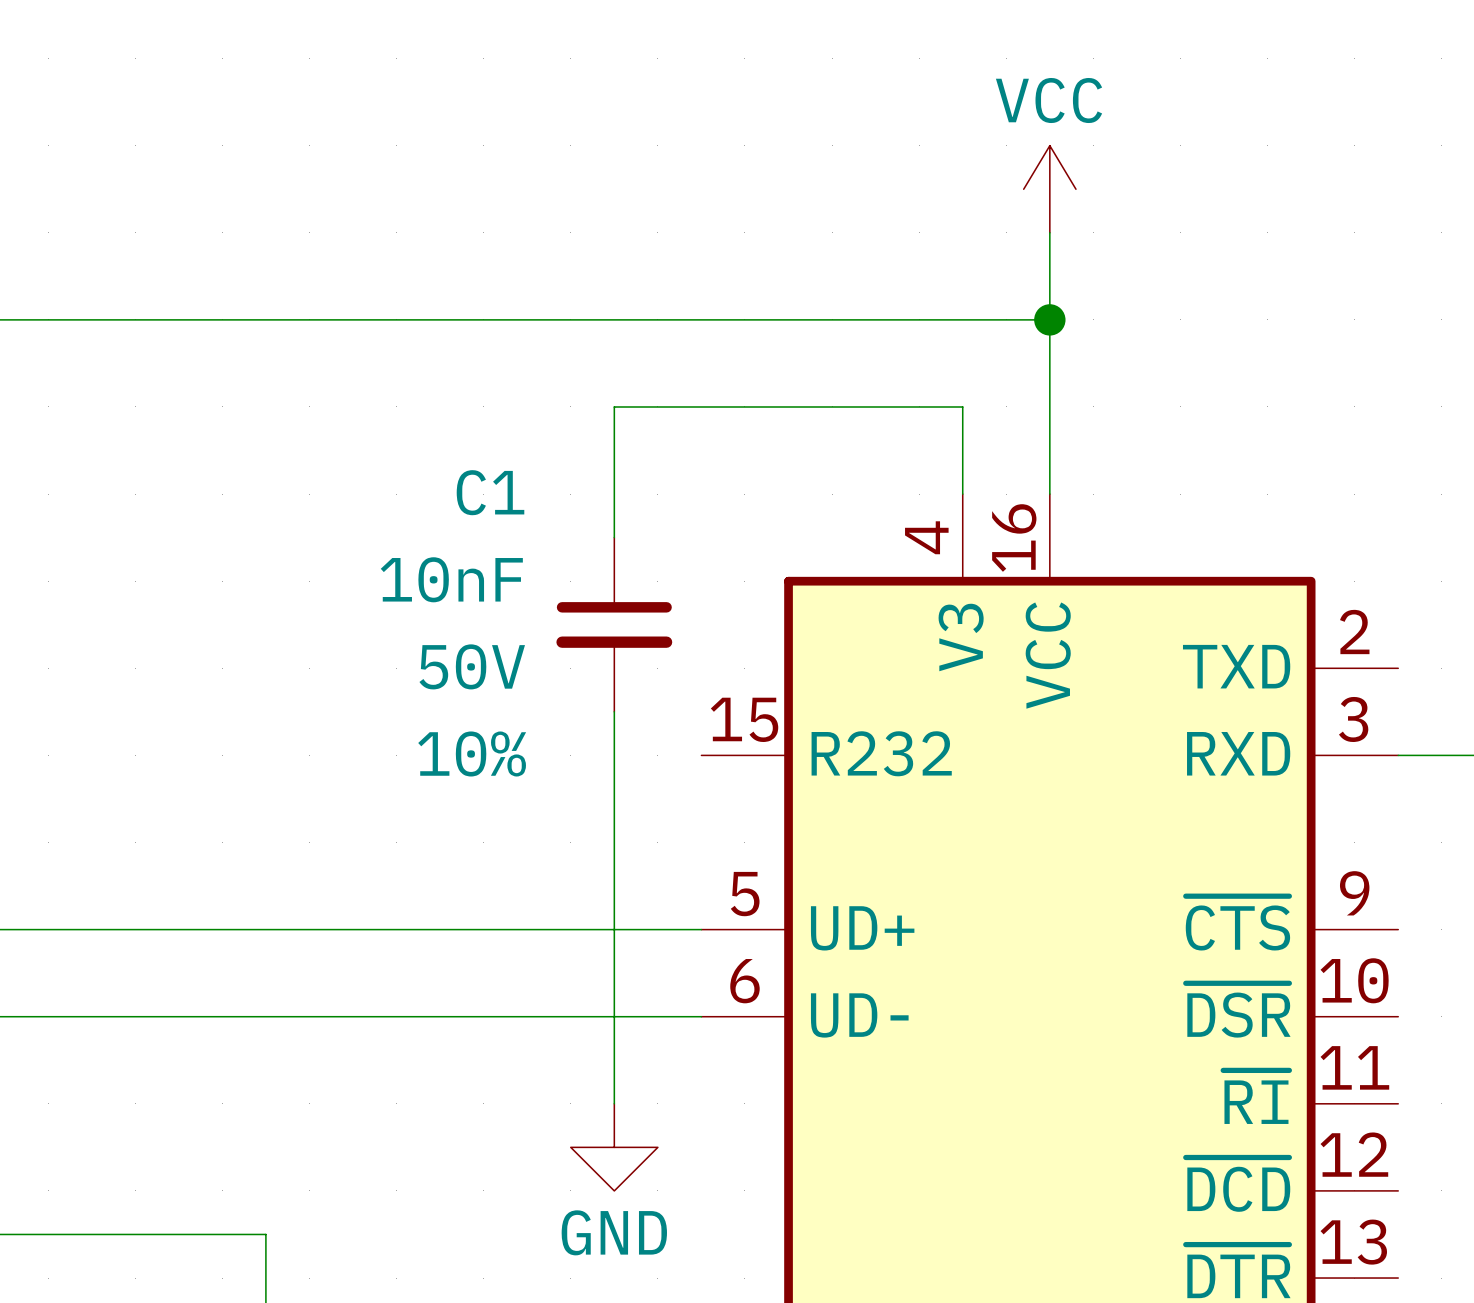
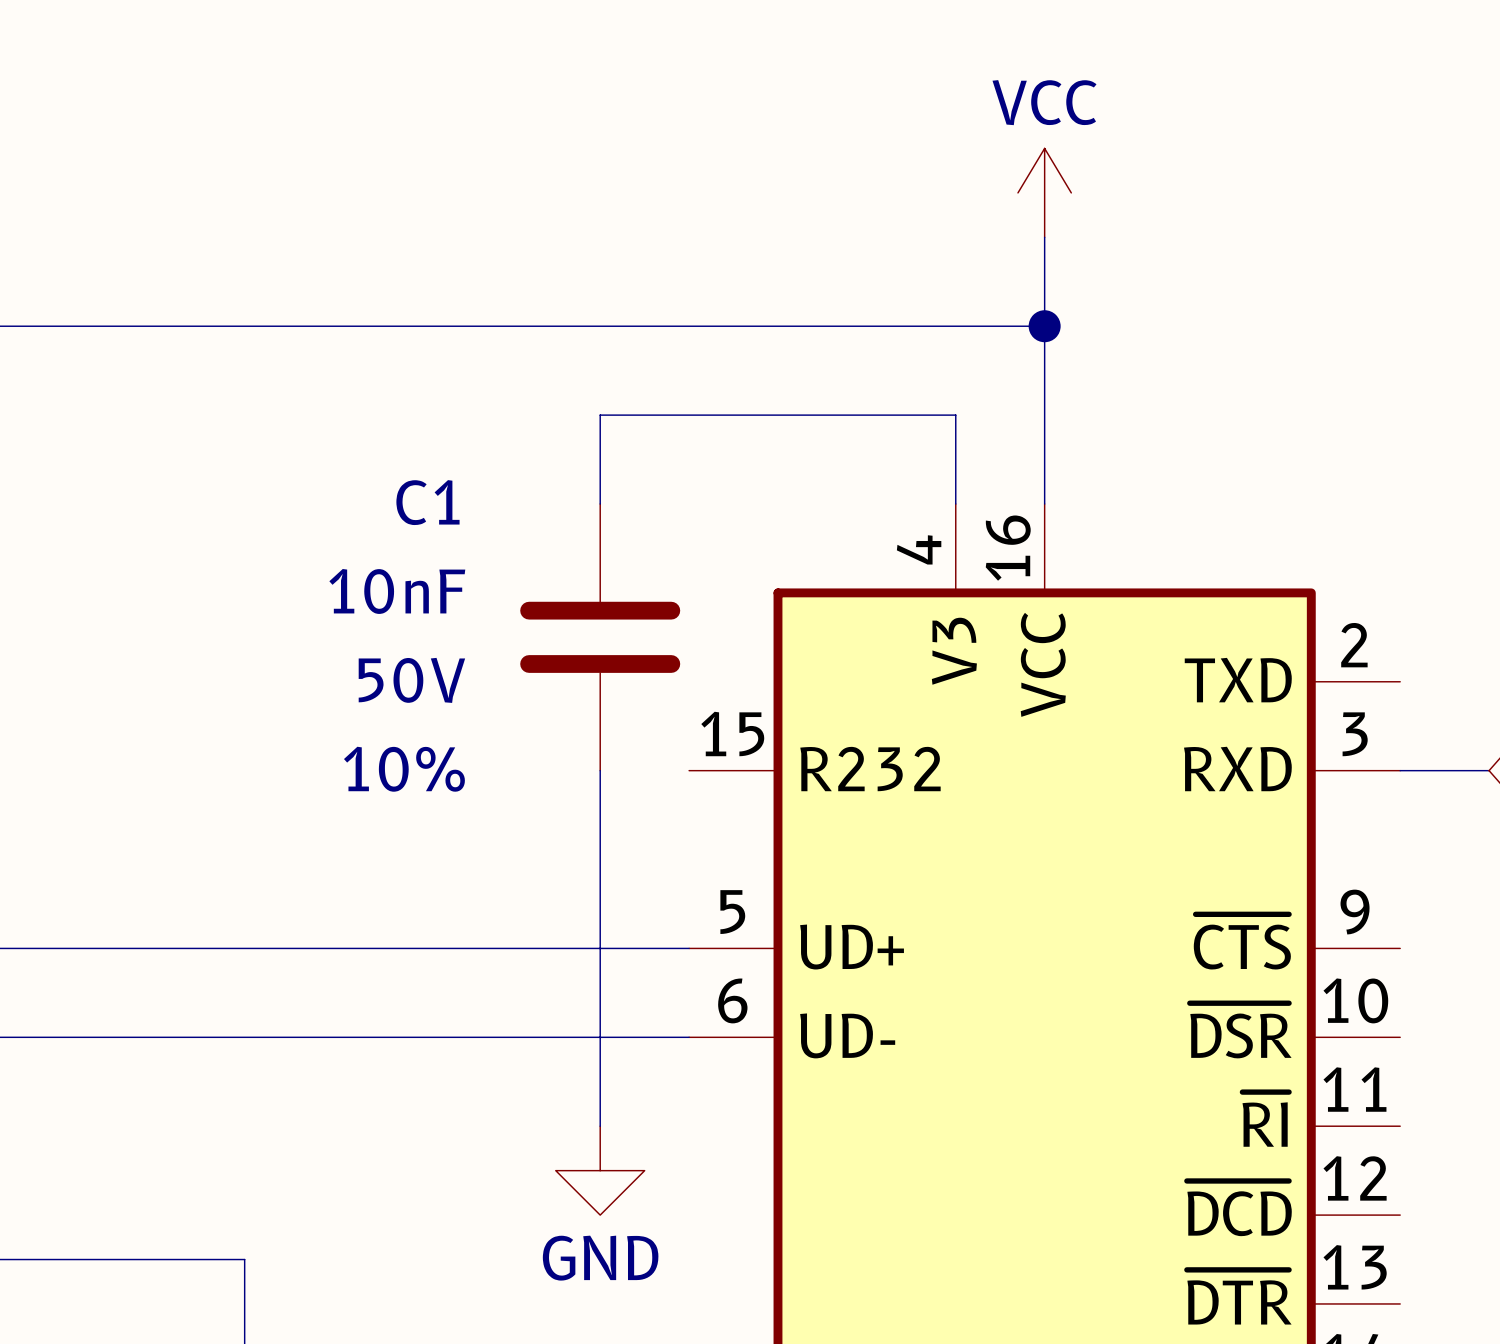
C1 symbol: [556, 537, 673, 712] -> [520, 504, 681, 771]

